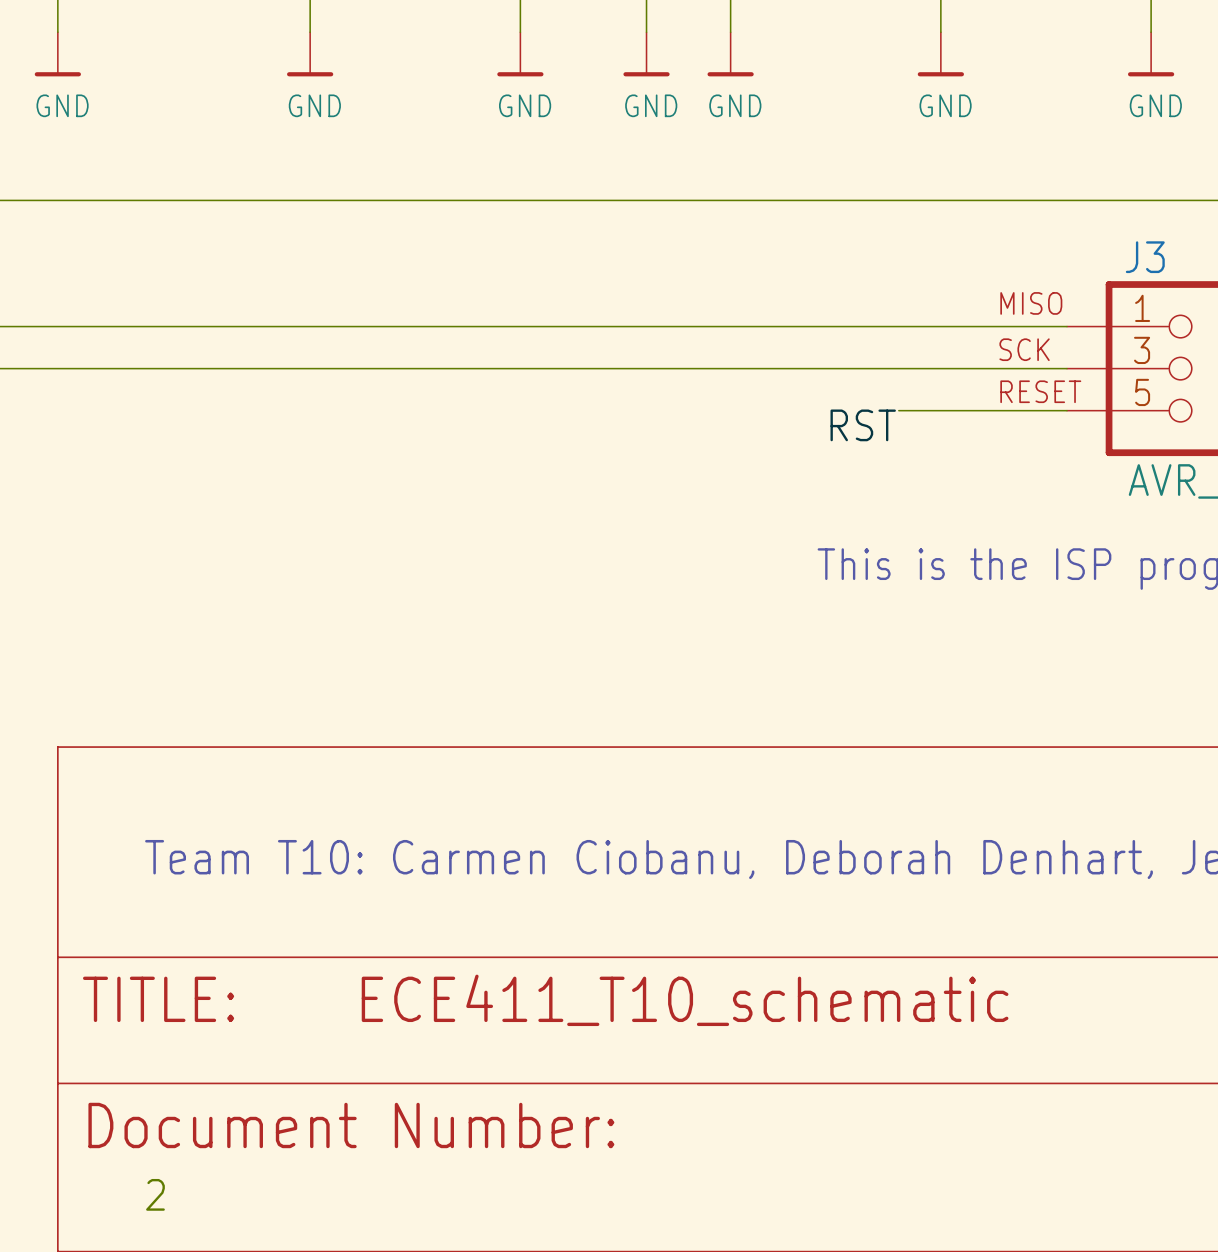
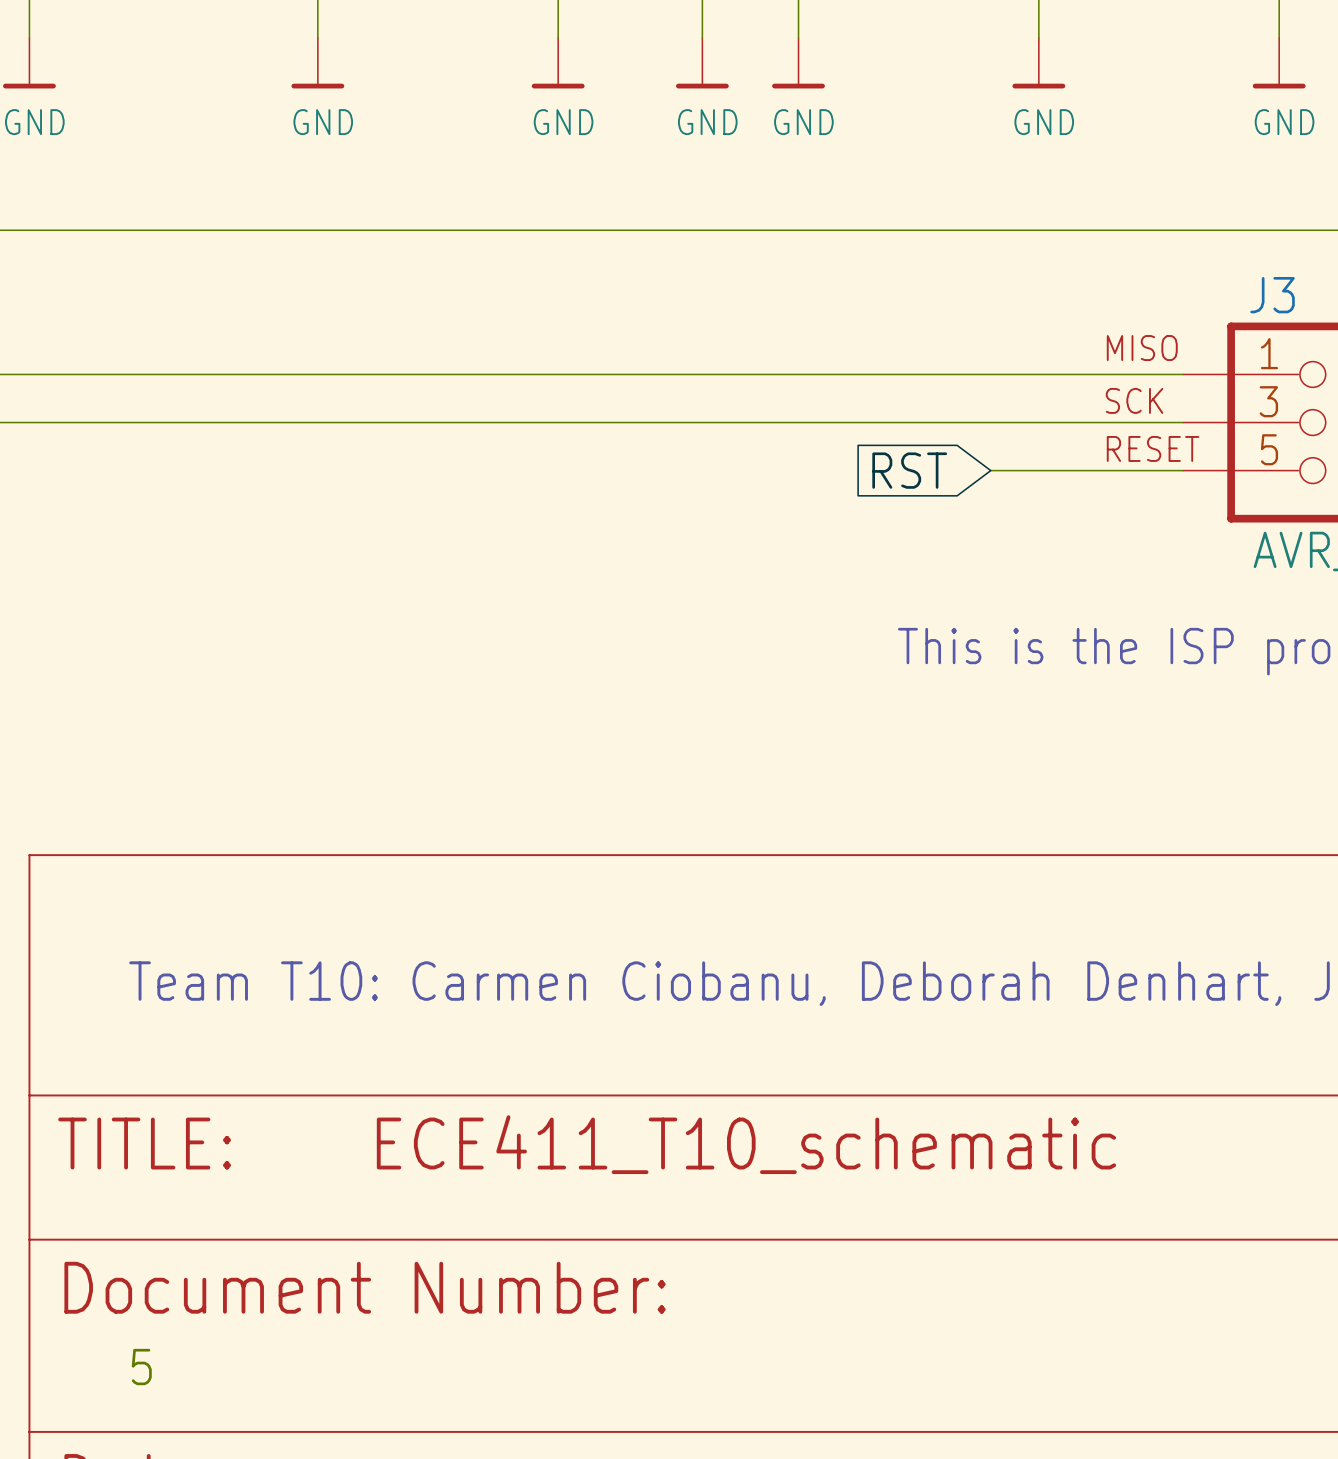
global label: none -> RST (909, 470)
label: RST (863, 425) -> none
text: 2 (155, 1194) -> 5 (141, 1367)

